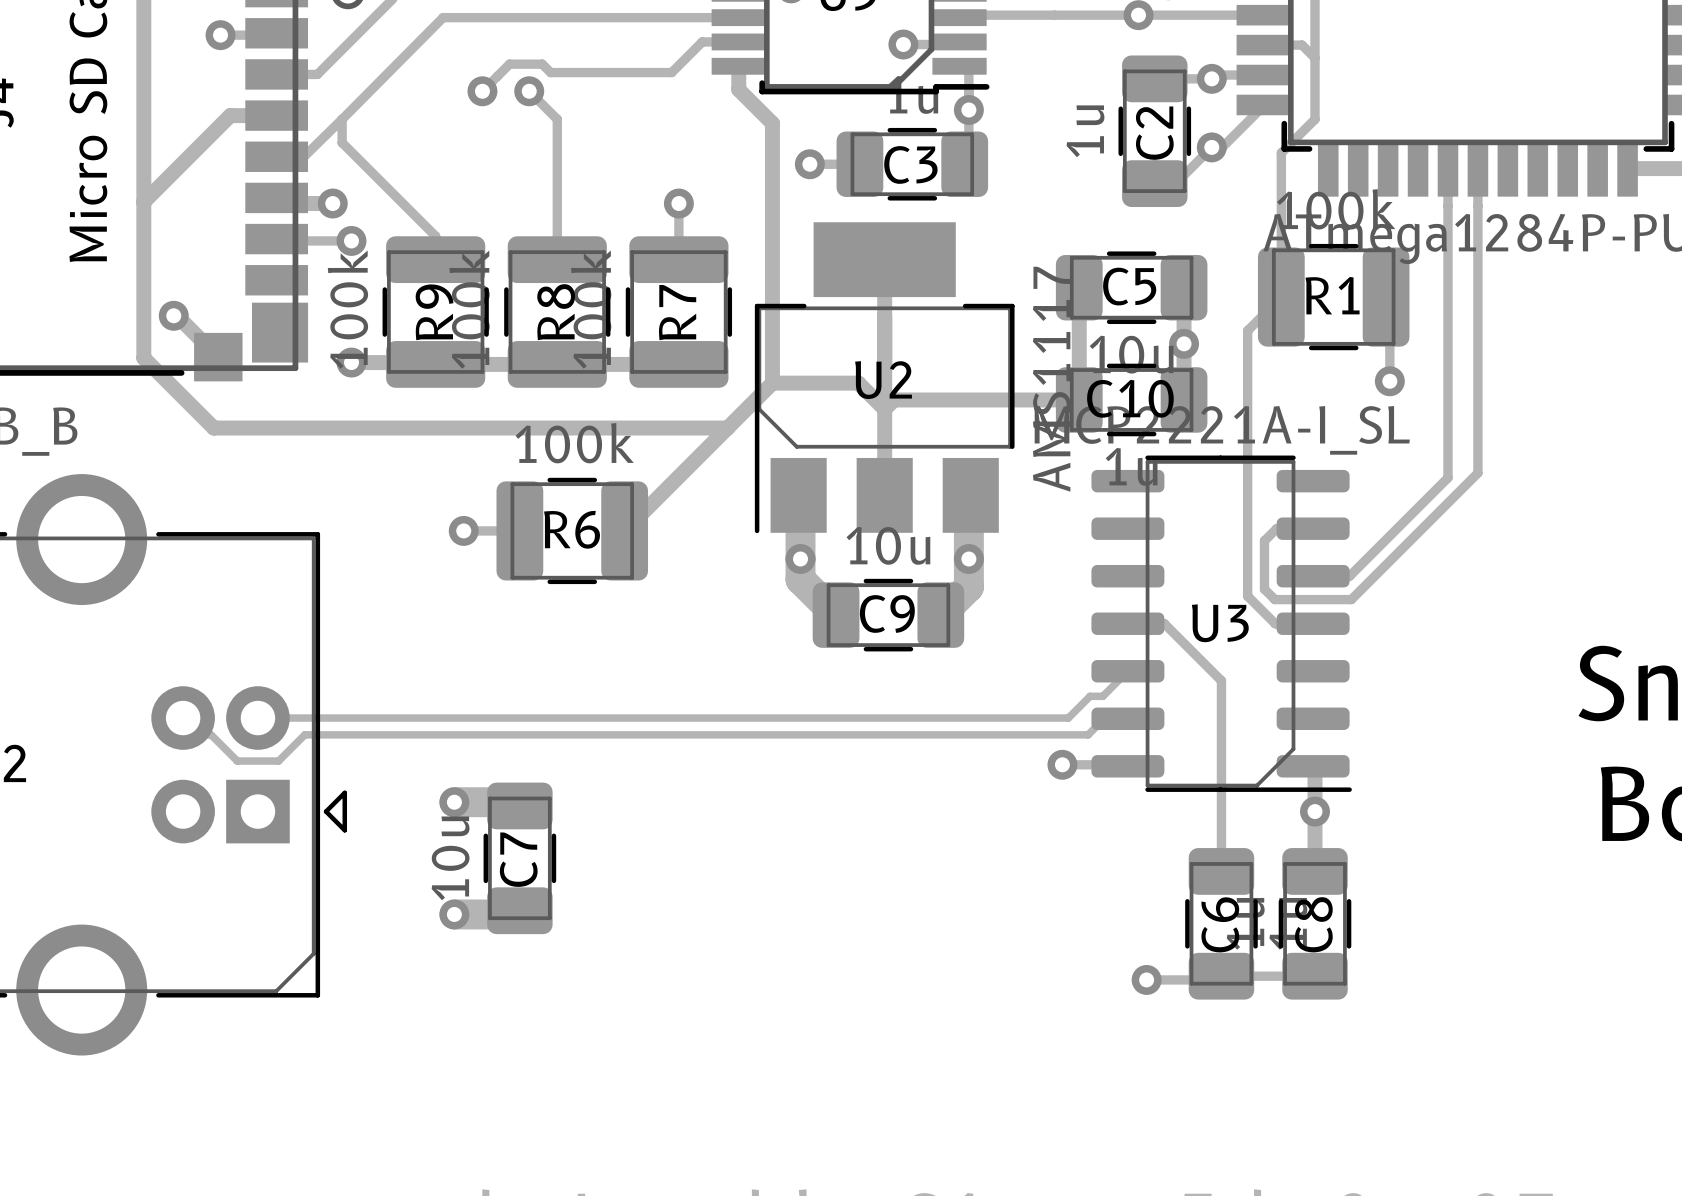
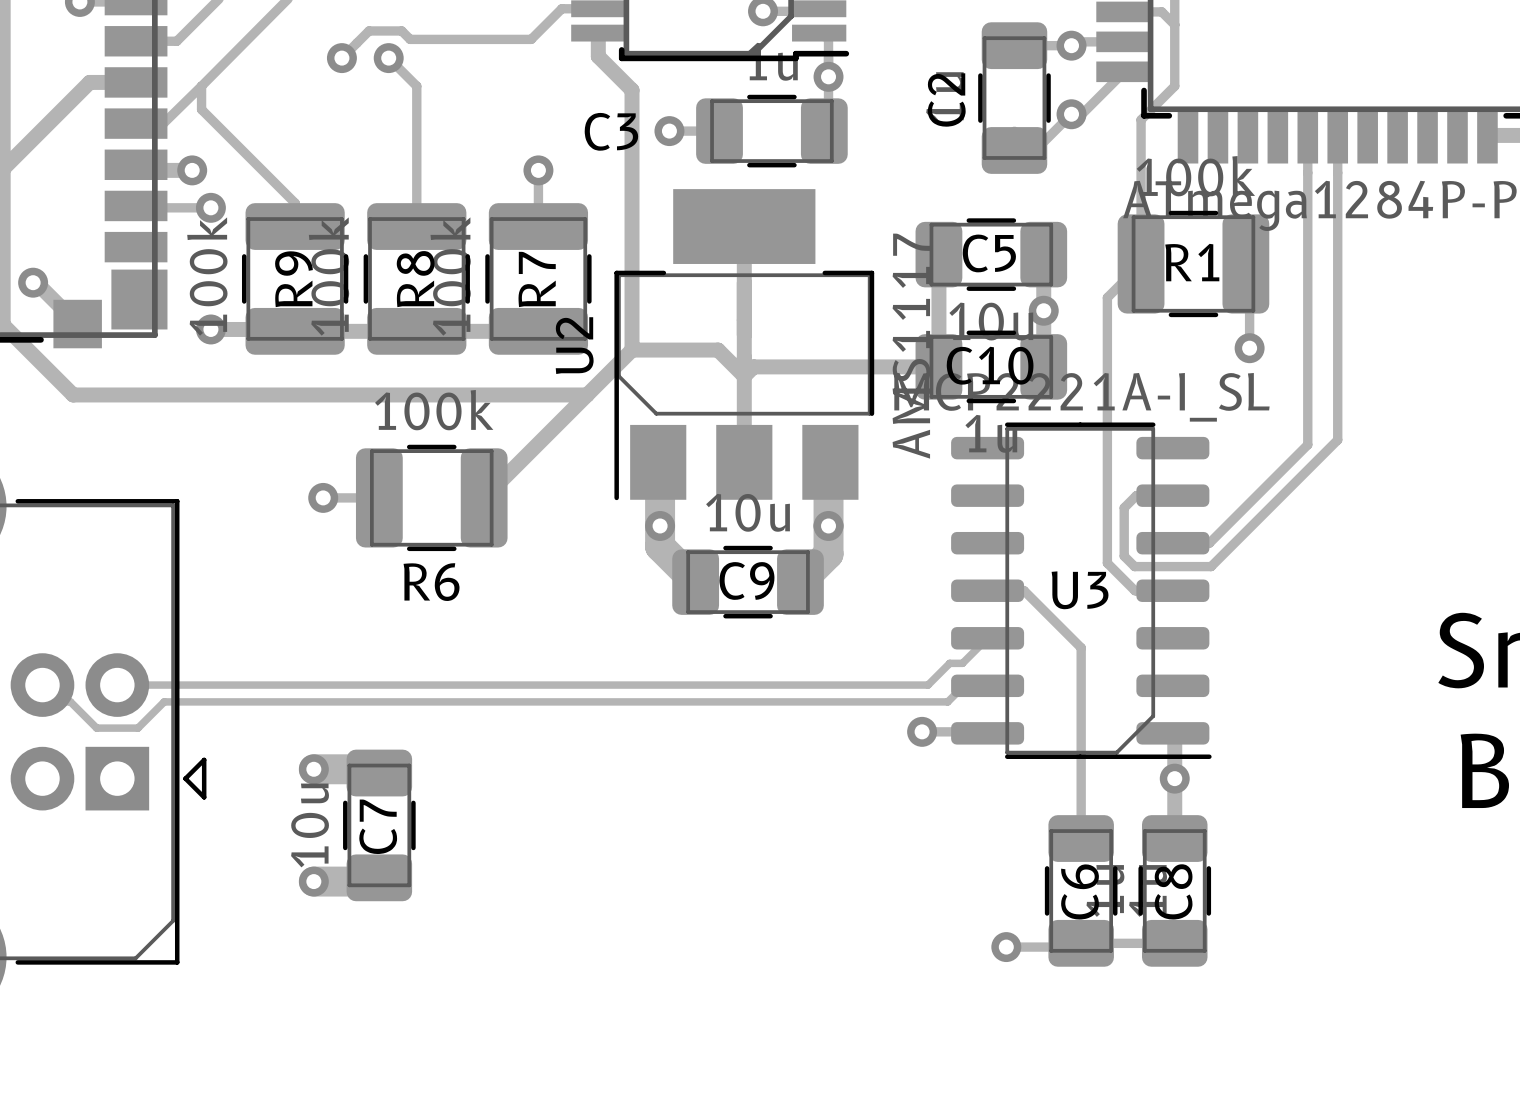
C2 name position: C2 (1154, 133) -> C2 (946, 99)
C3 name position: C3 (910, 164) -> C3 (611, 131)
U2 name rotation: 0° (883, 380) -> 90° counterclockwise (574, 345)
U2 name position: U2 (883, 380) -> U2 (574, 345)
R6 name position: R6 (572, 529) -> R6 (431, 582)

